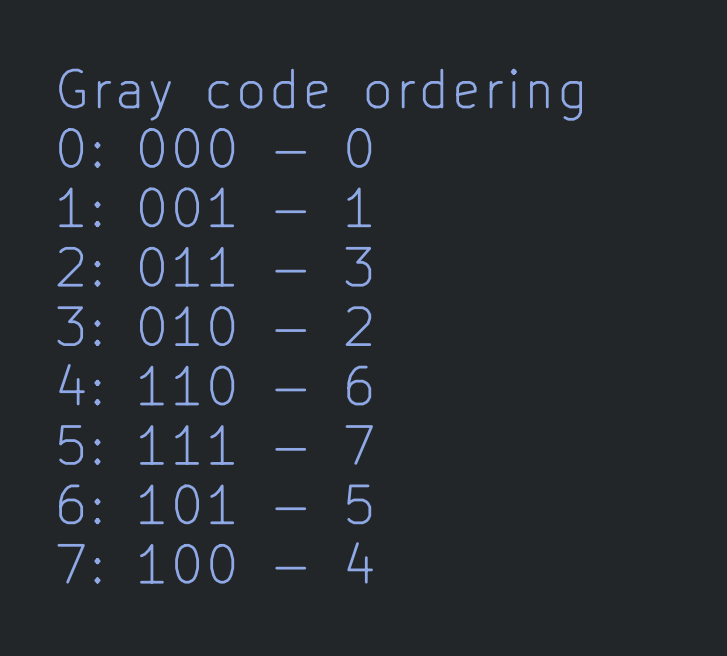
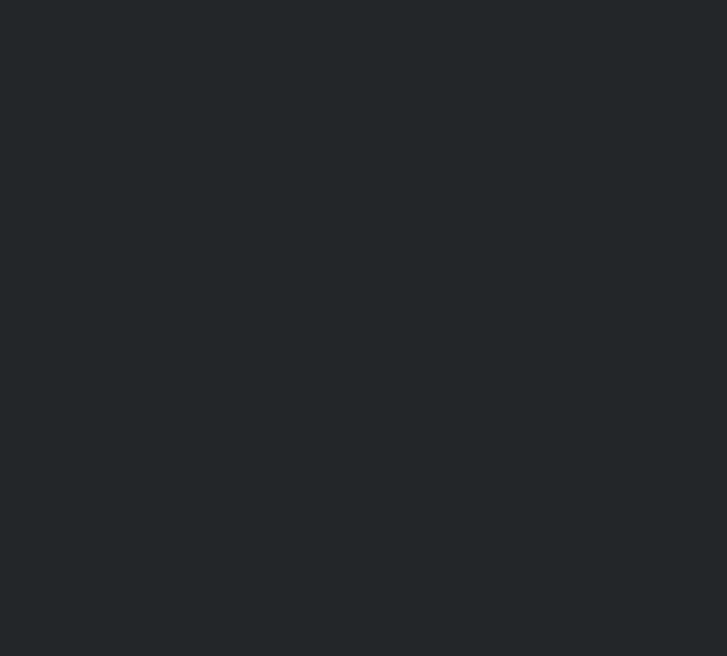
text: Gray code ordering (320, 94) -> none
text: 0: 000 - 0 (215, 147) -> none
text: 1: 001 - 1 (215, 207) -> none
text: 2: 011 - 3 (214, 266) -> none
text: 3: 010 - 2 (214, 326) -> none
text: 4: 110 - 6 (215, 384) -> none
text: 5: 111 - 7 (216, 444) -> none
text: 6: 101 - 5 (215, 504) -> none
text: 7: 100 - 4 (215, 562) -> none

